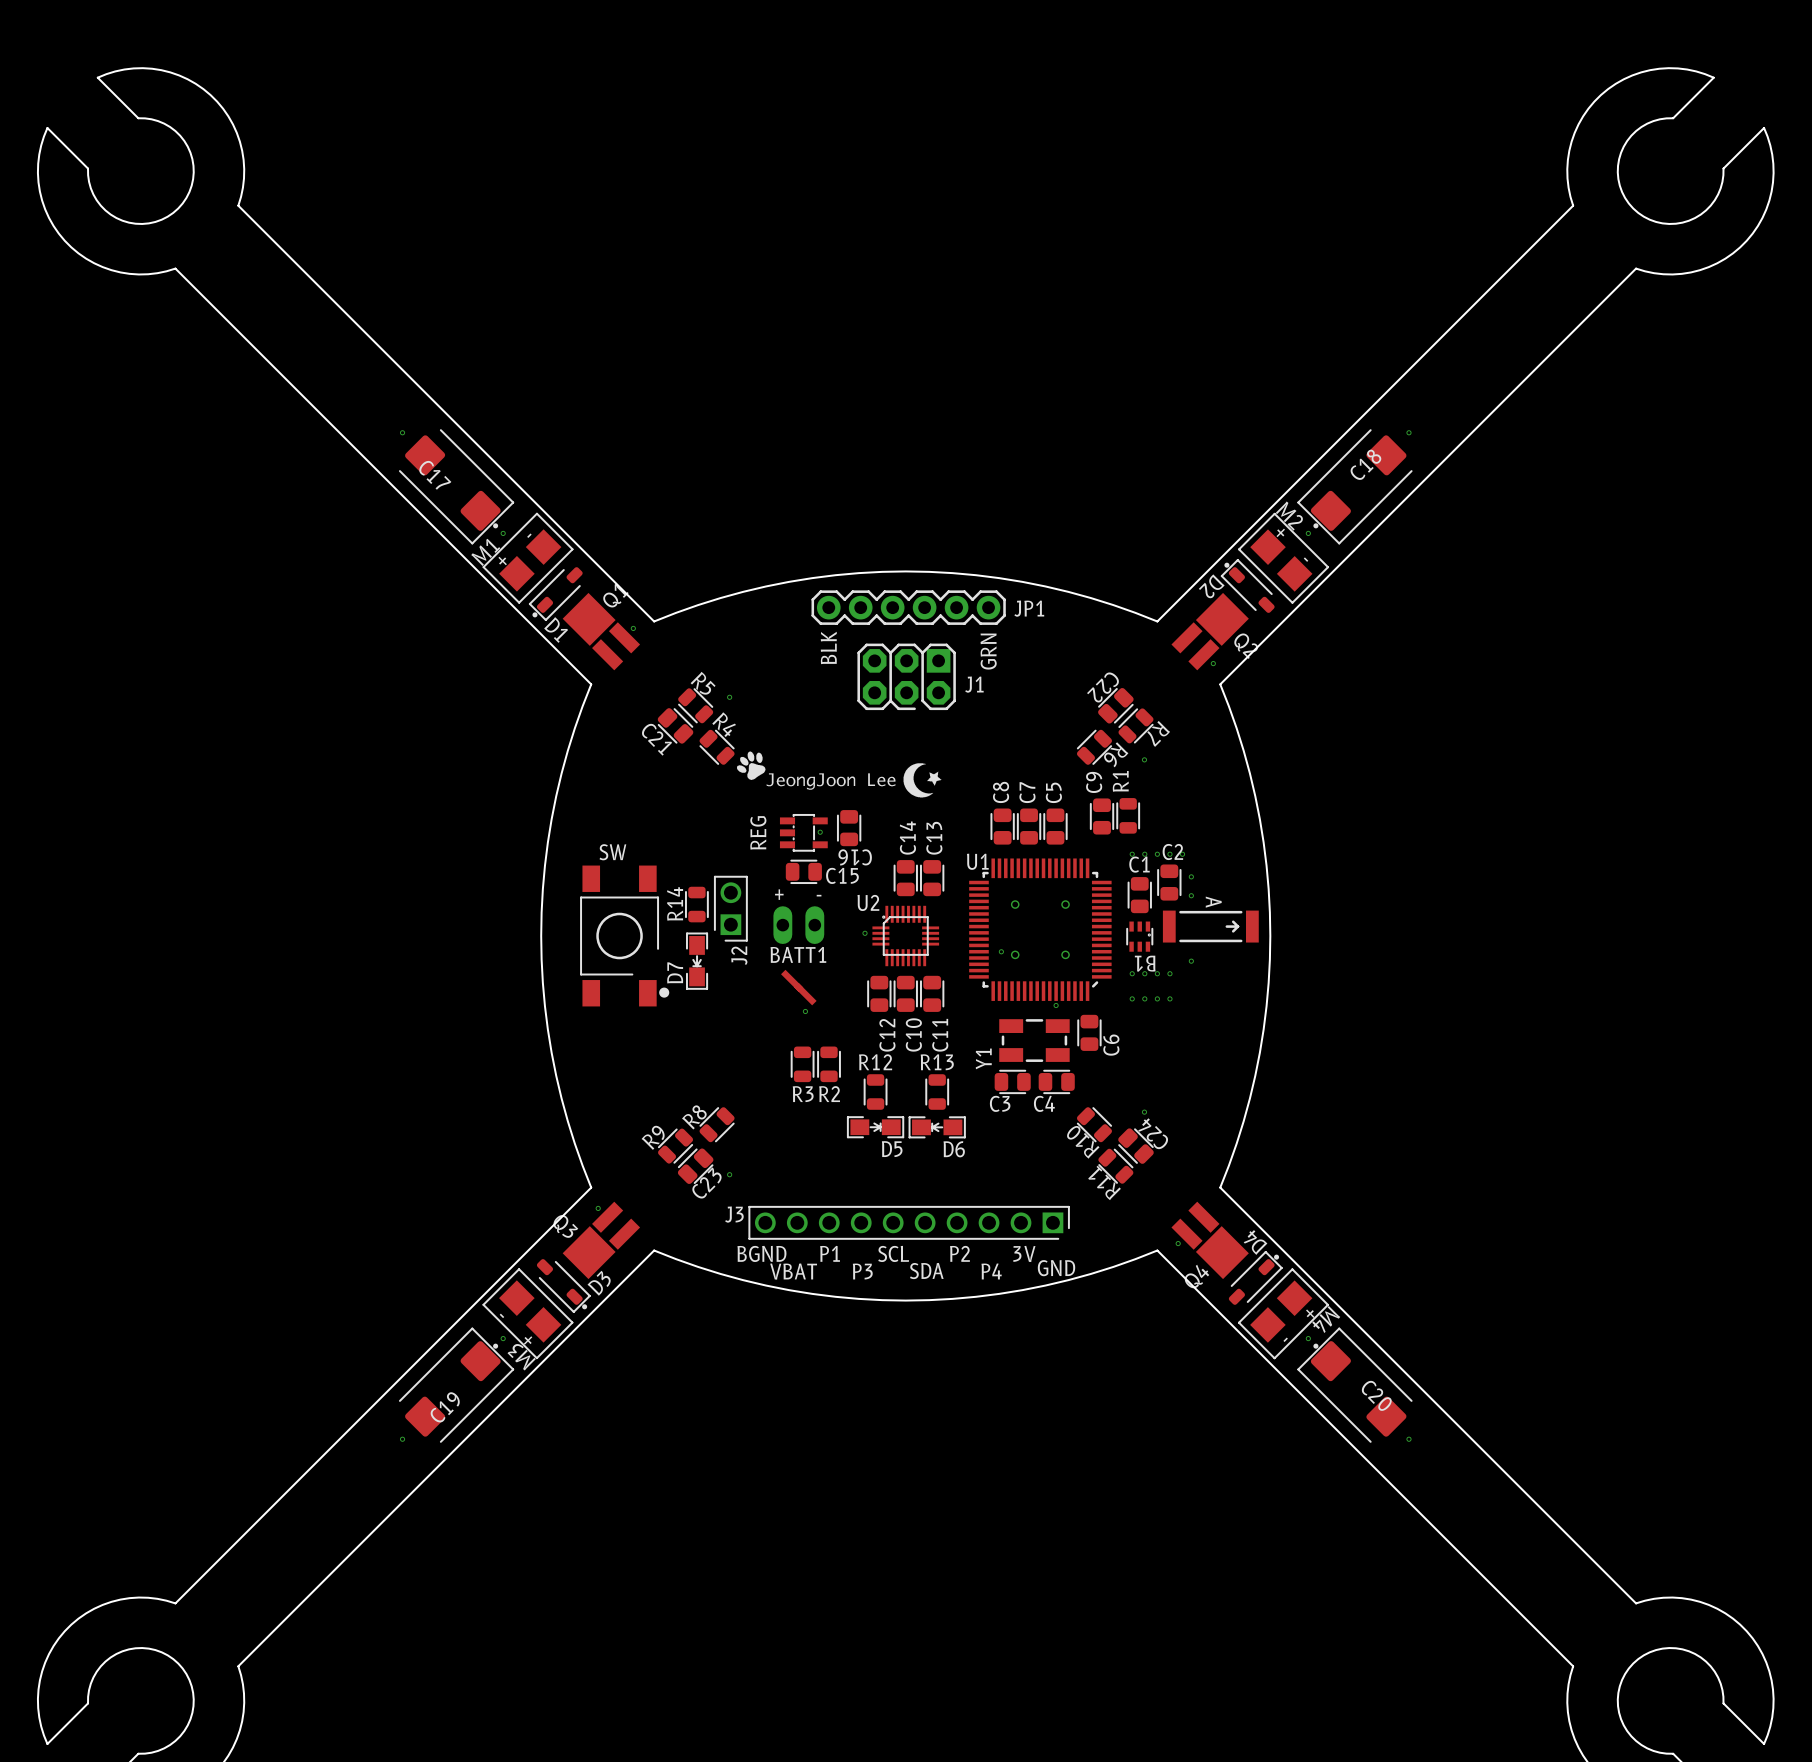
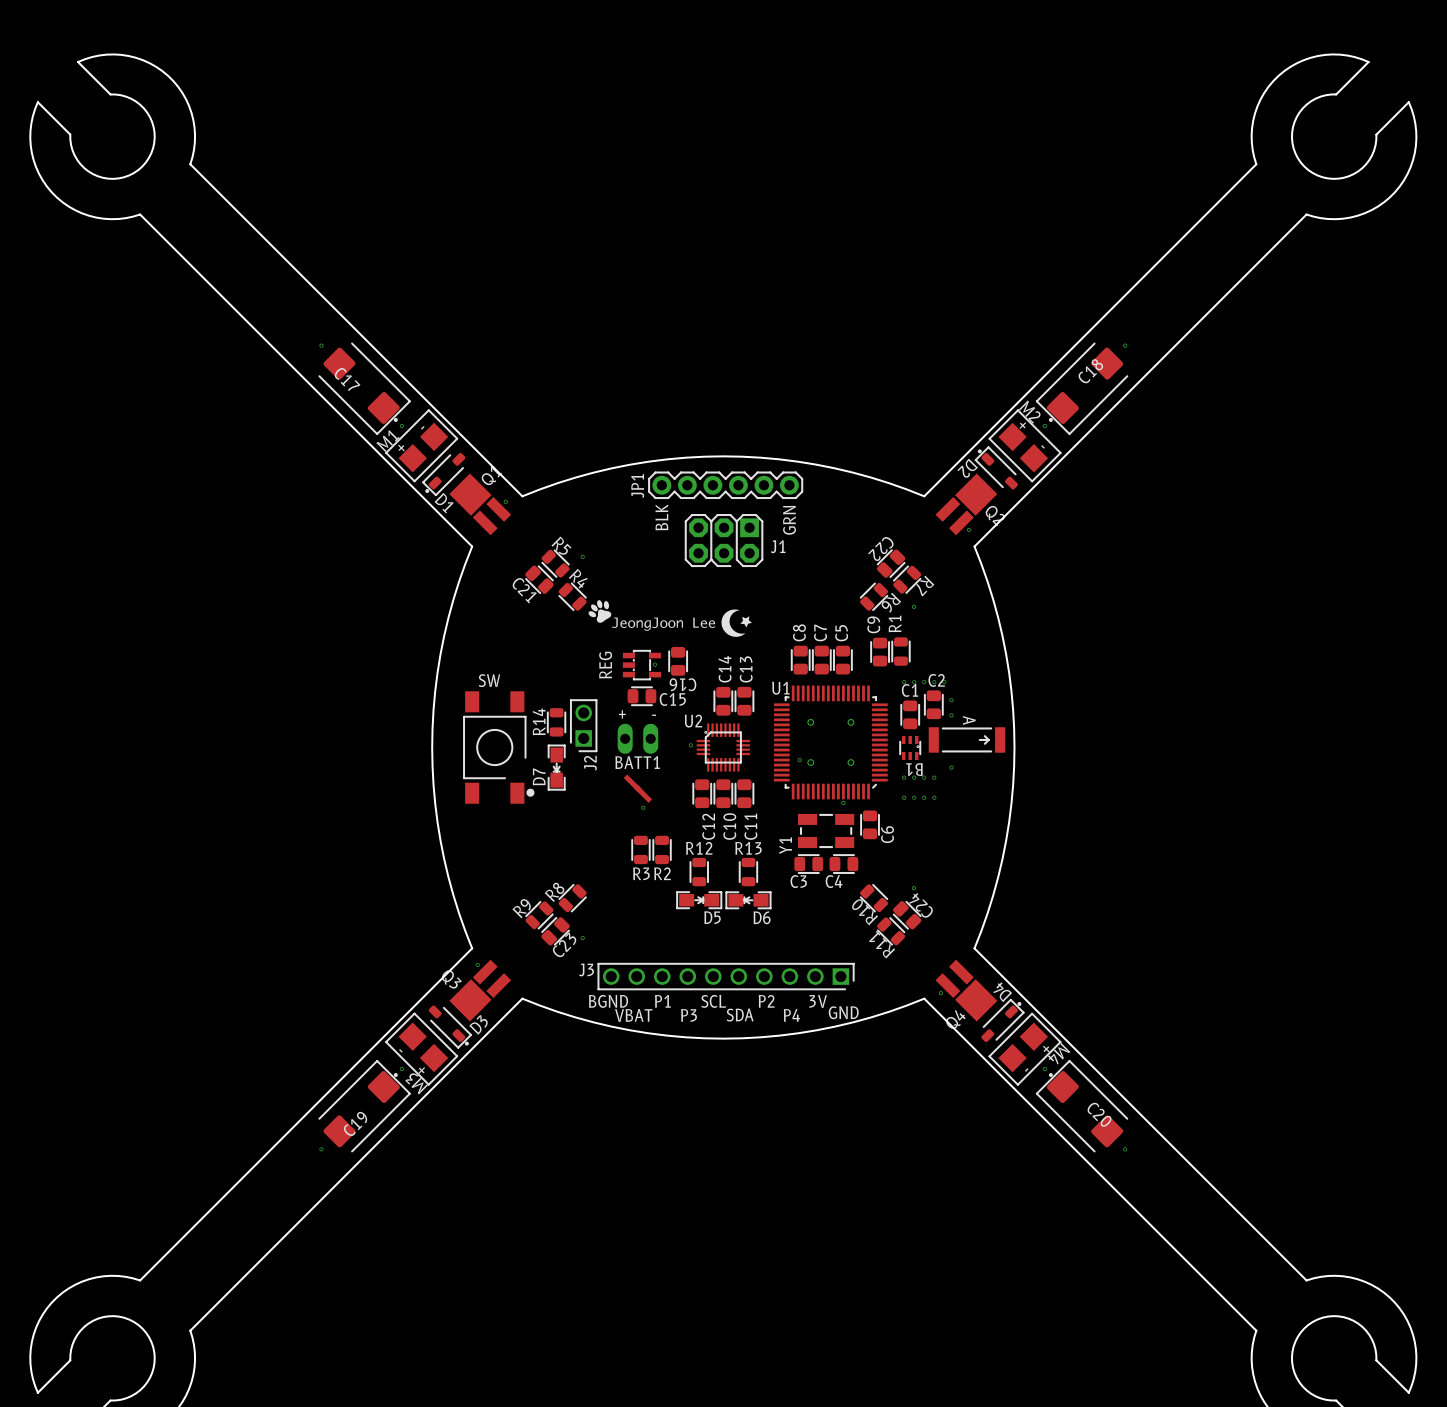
JP1 name rotation: 0° (1029, 608) -> 90° counterclockwise (637, 486)
JP1 name position: JP1 (1029, 608) -> JP1 (637, 486)

